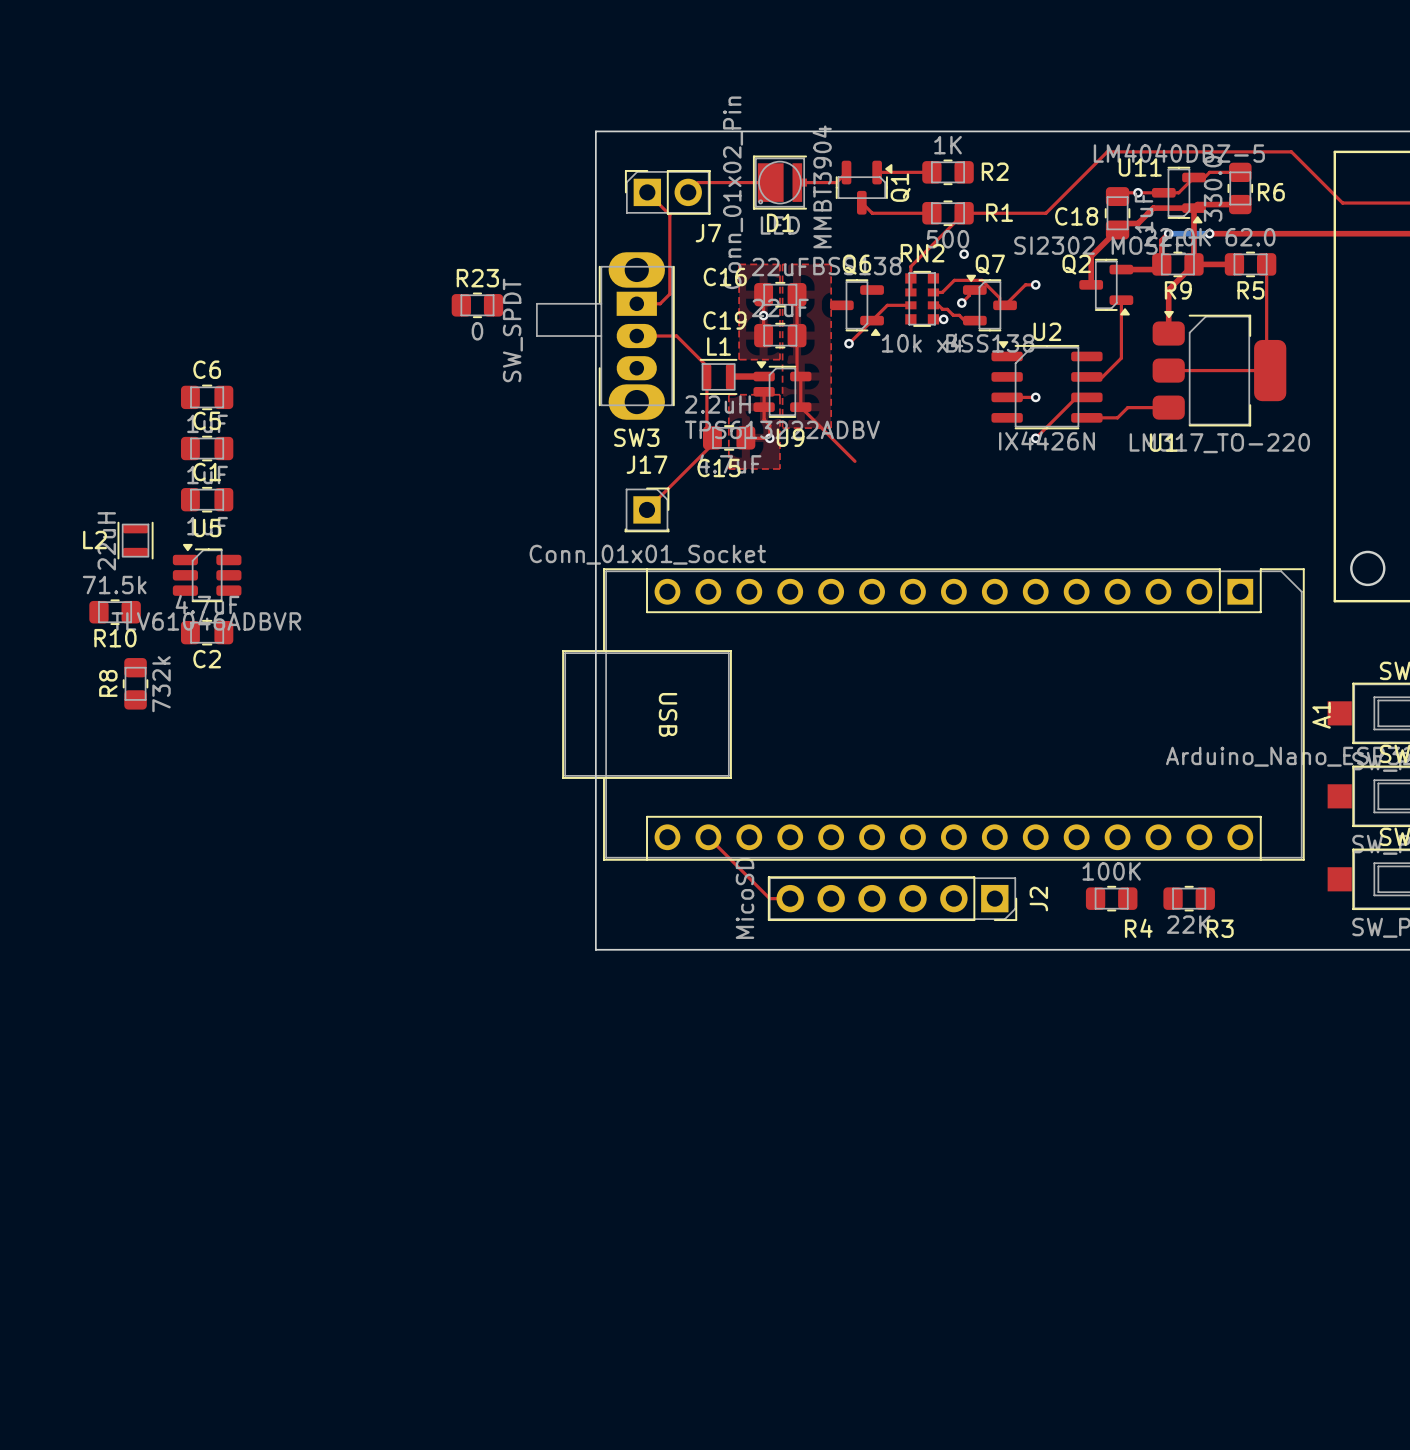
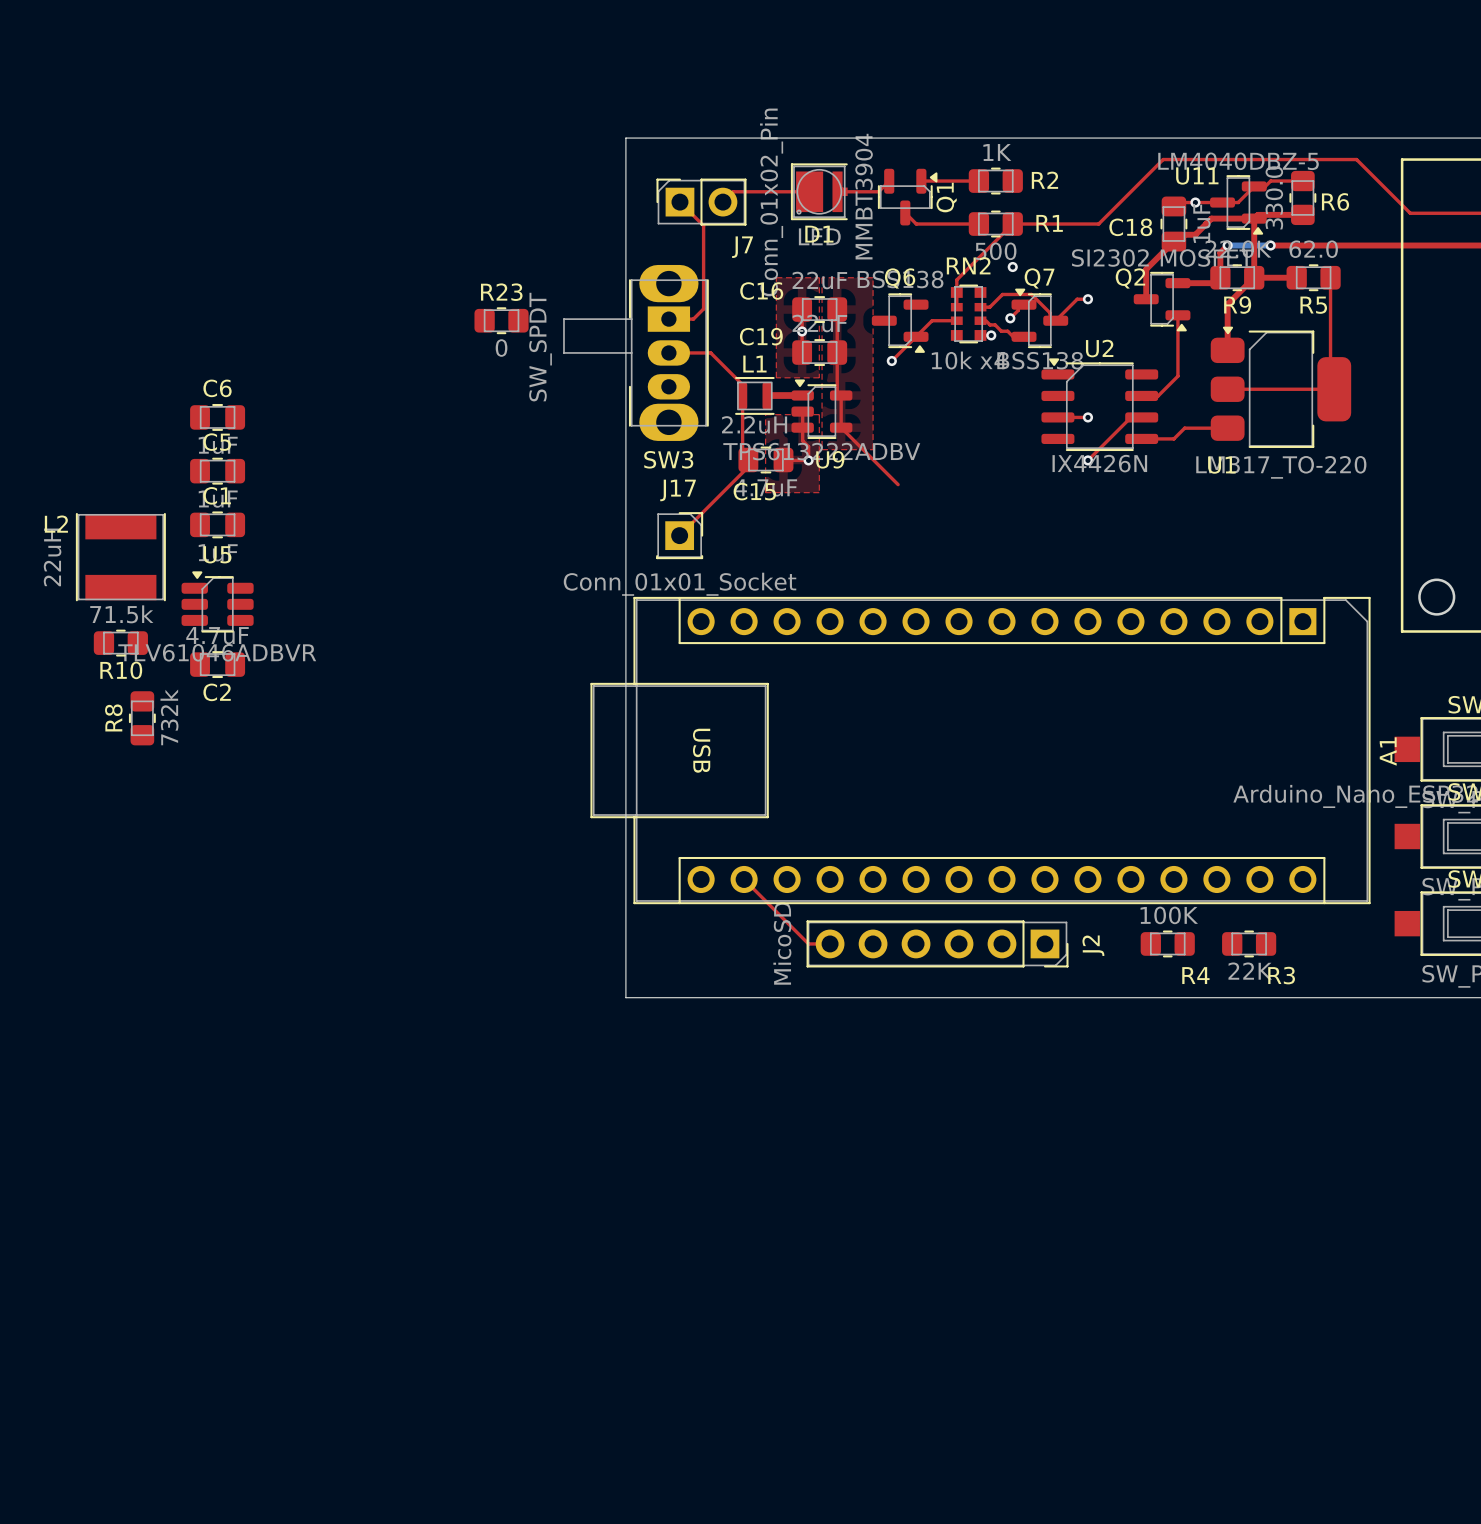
L2 footprint: [117, 521, 154, 560] -> [75, 512, 166, 602]
L2 name position: L2 (95, 540) -> L2 (56, 524)
L2 value position: 22uH (106, 541) -> 22uH (52, 557)

